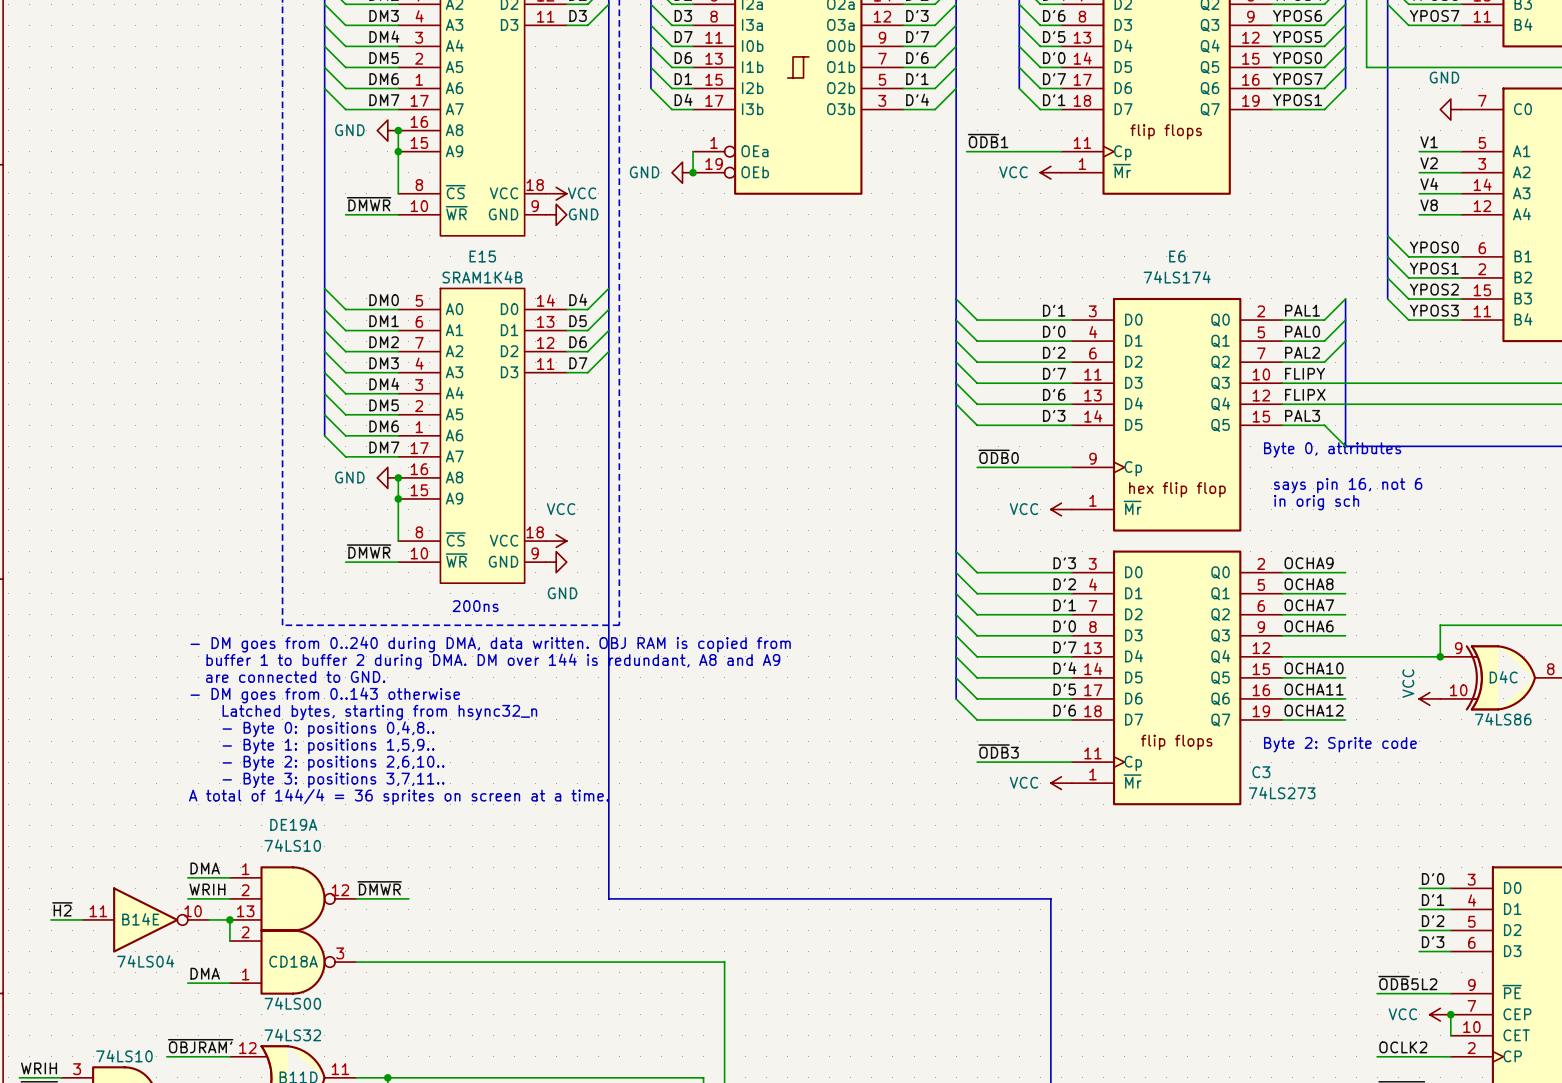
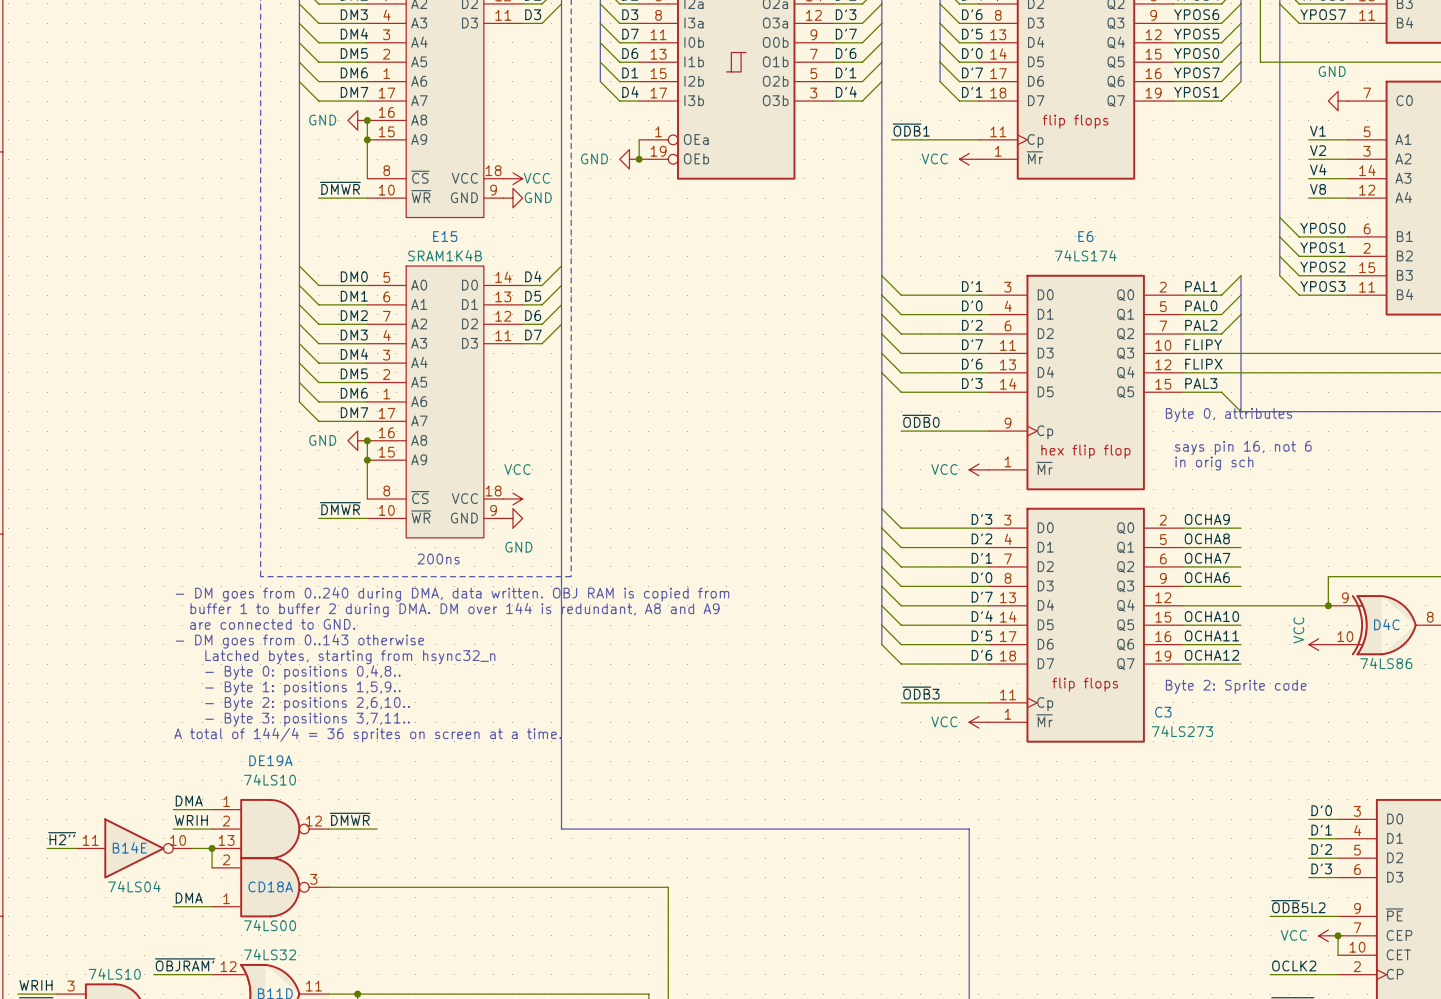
label: ~{H2} (62, 909) -> ~{H2''} (62, 838)

